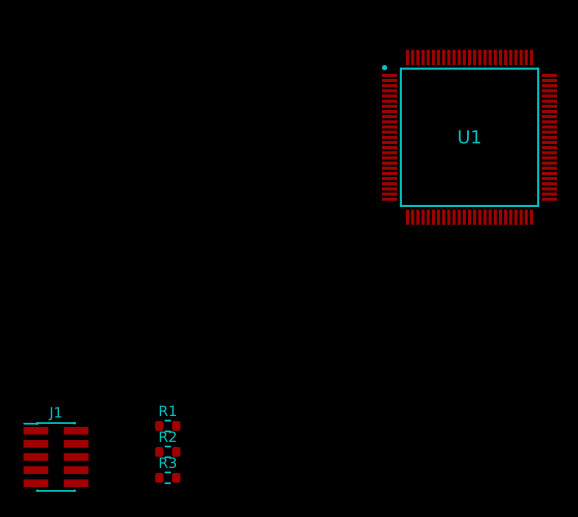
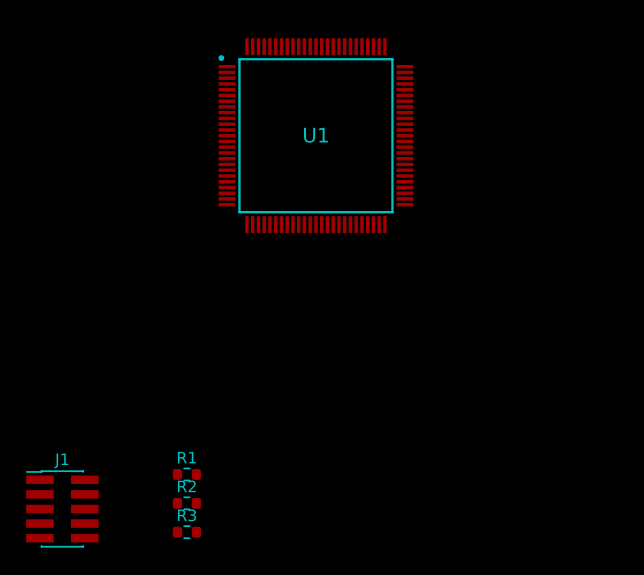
U1 position: (469, 137) -> (315, 135)

